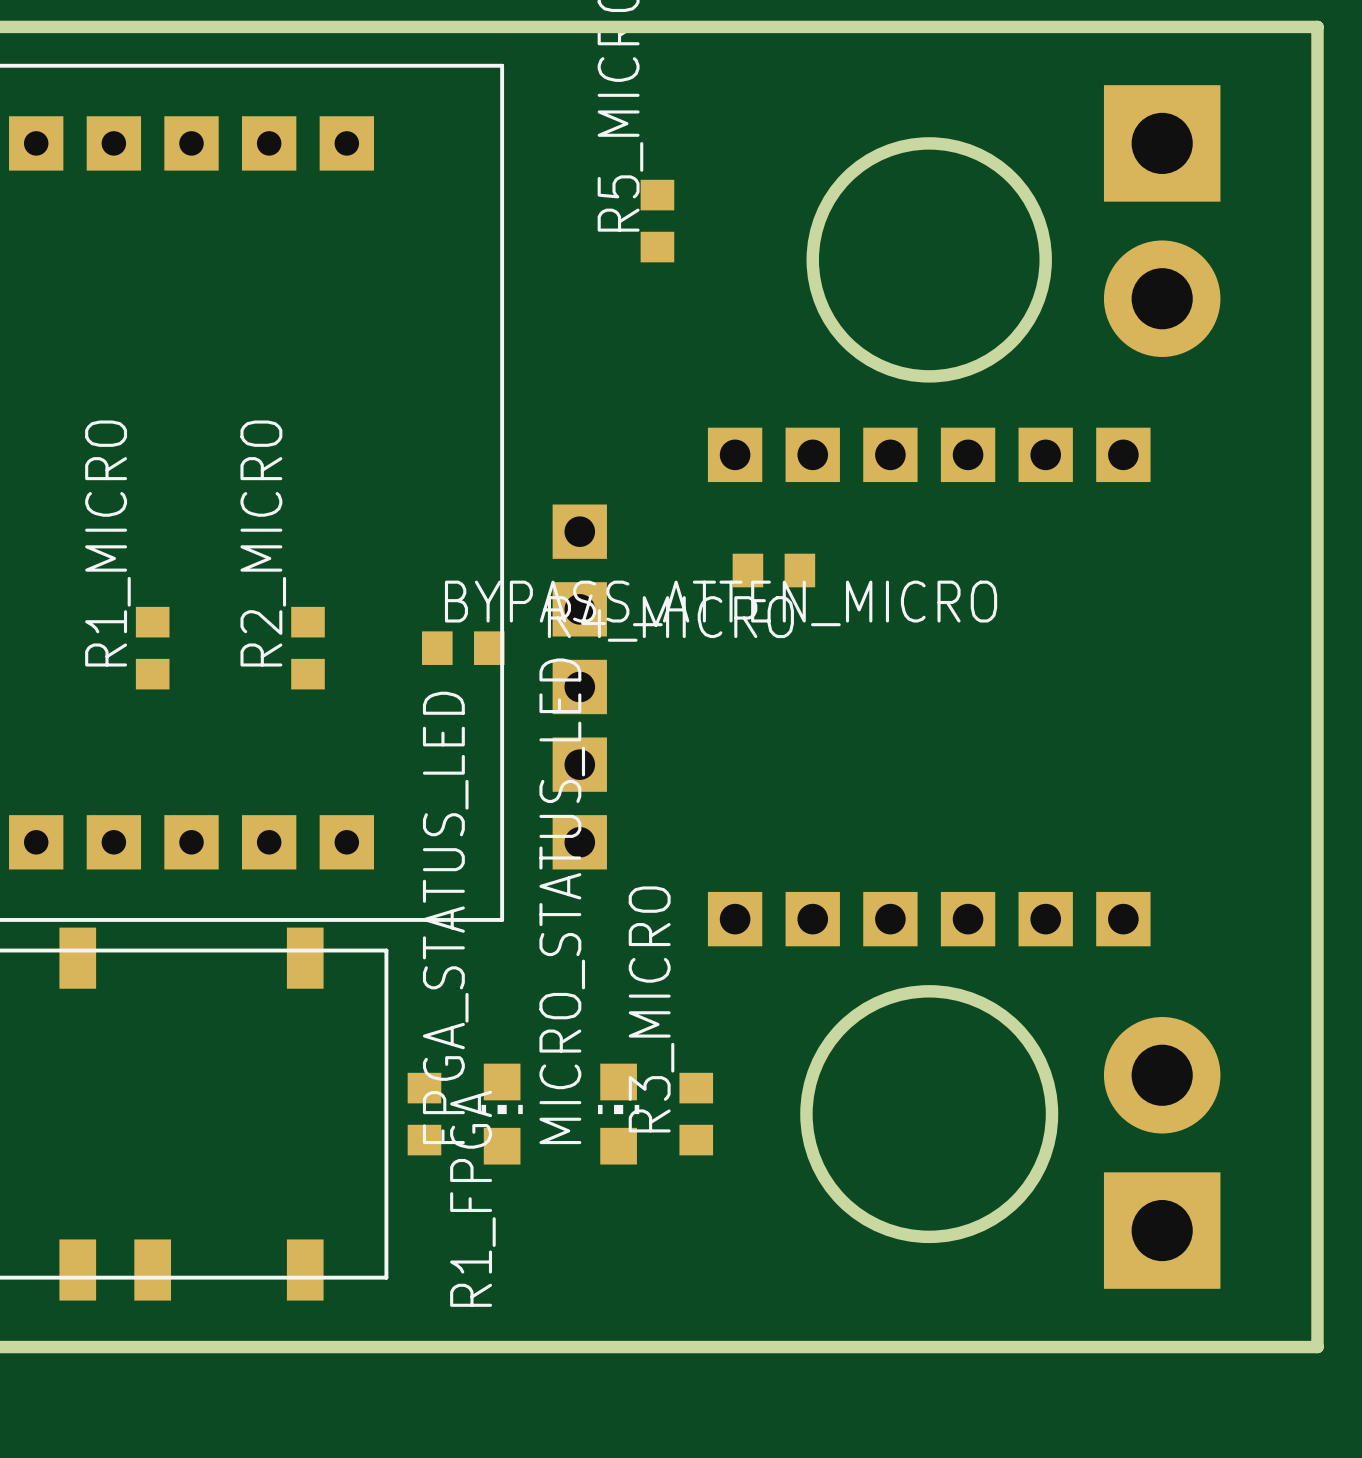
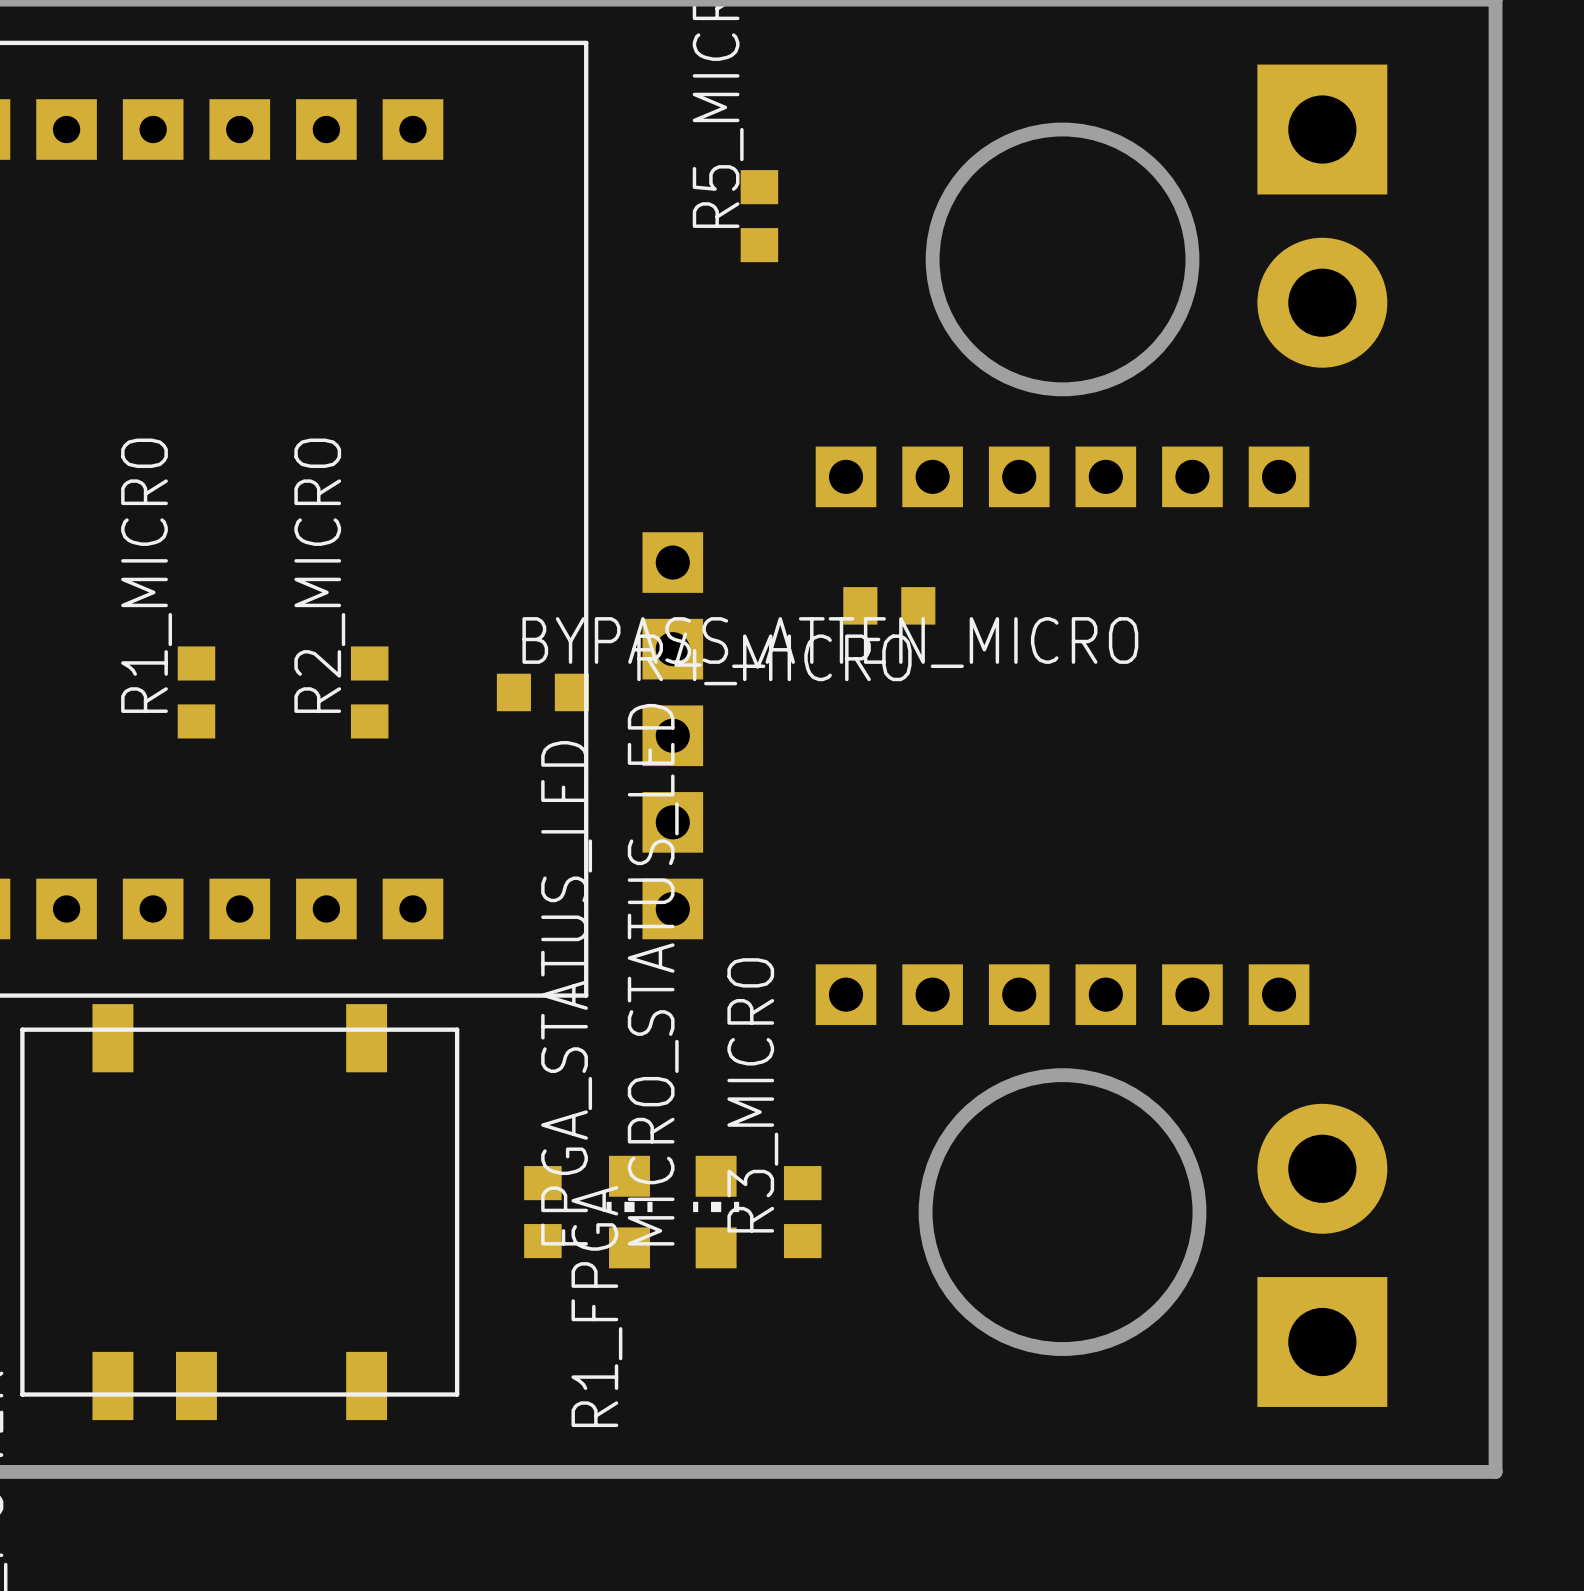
R1_FPGA position: (424, 1114) -> (542, 1212)
FPGA_STATUS_LED position: (502, 1114) -> (629, 1212)

